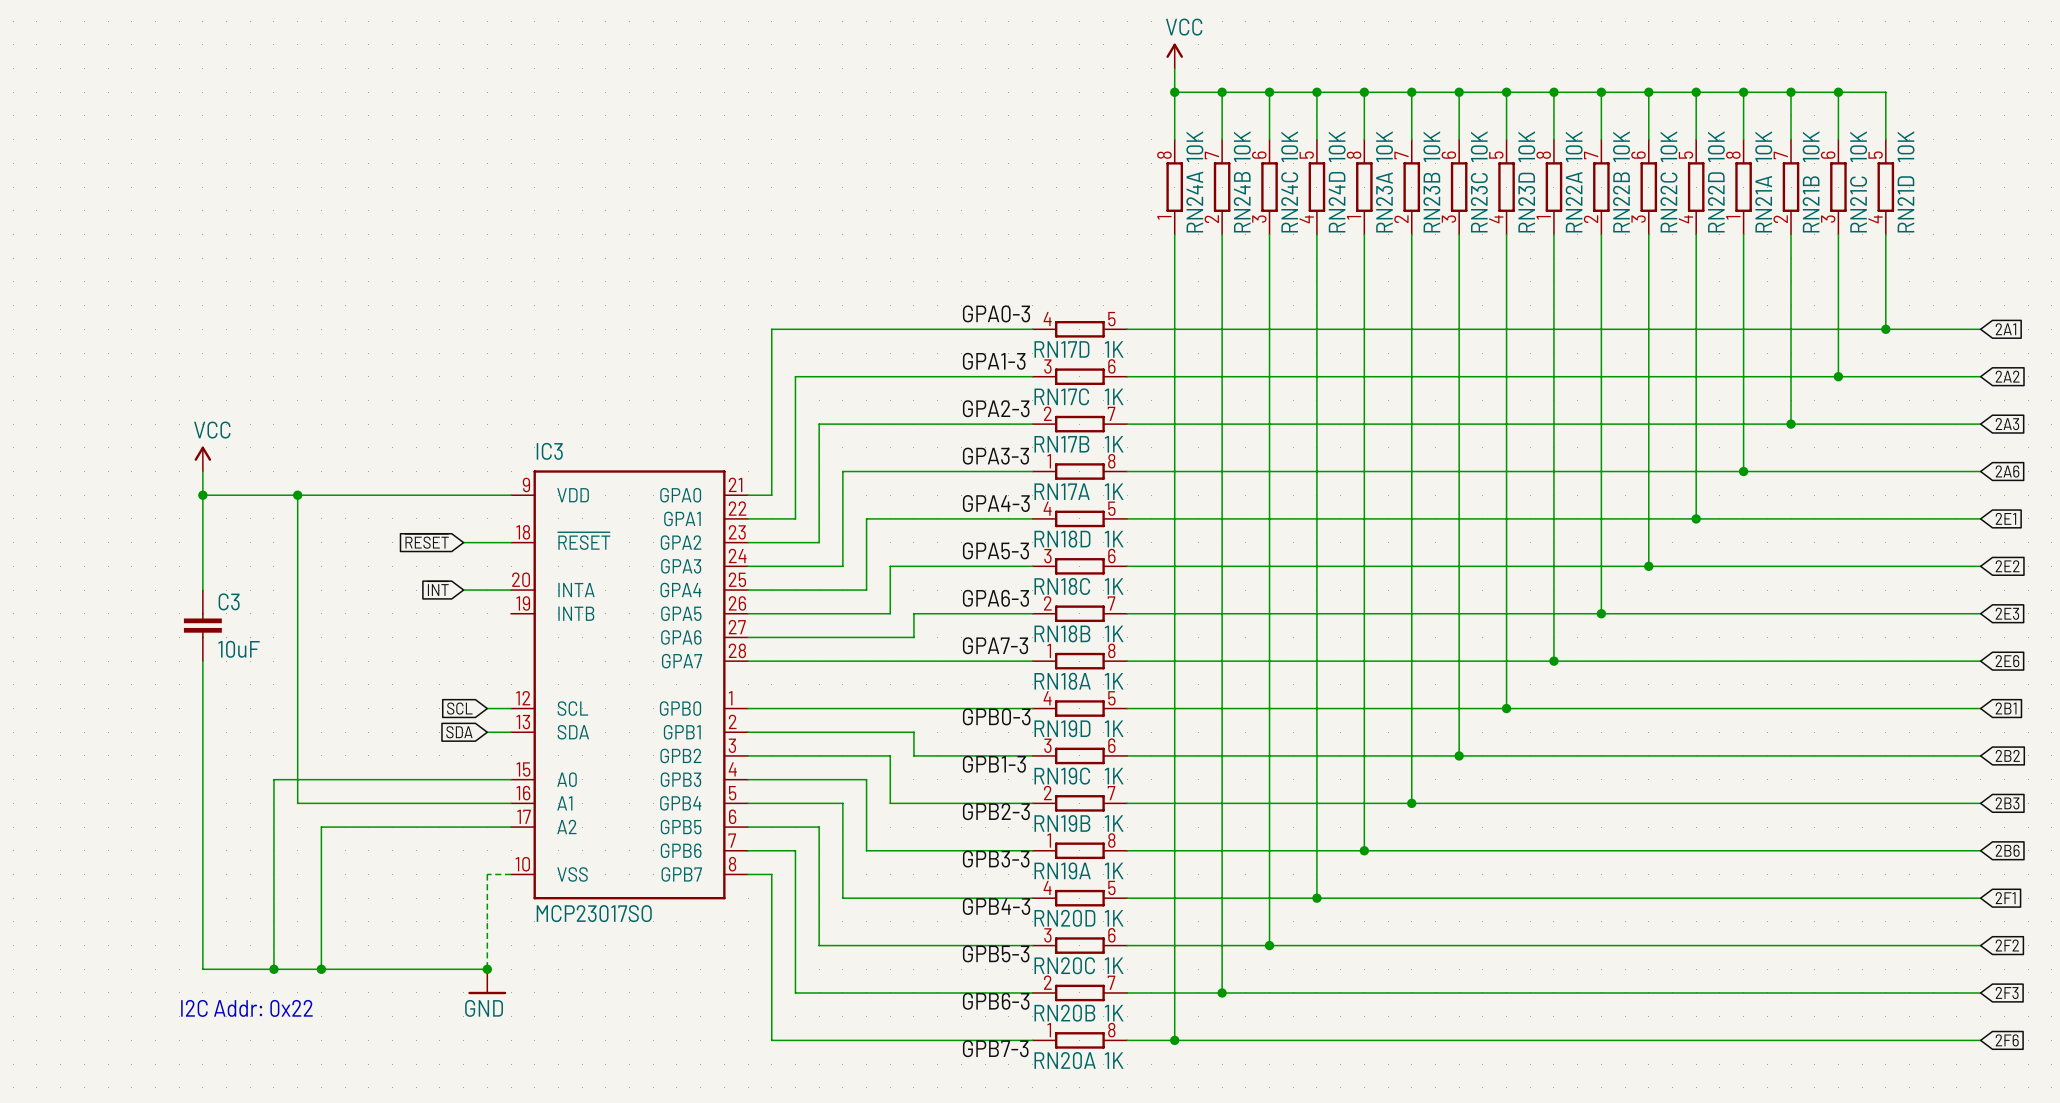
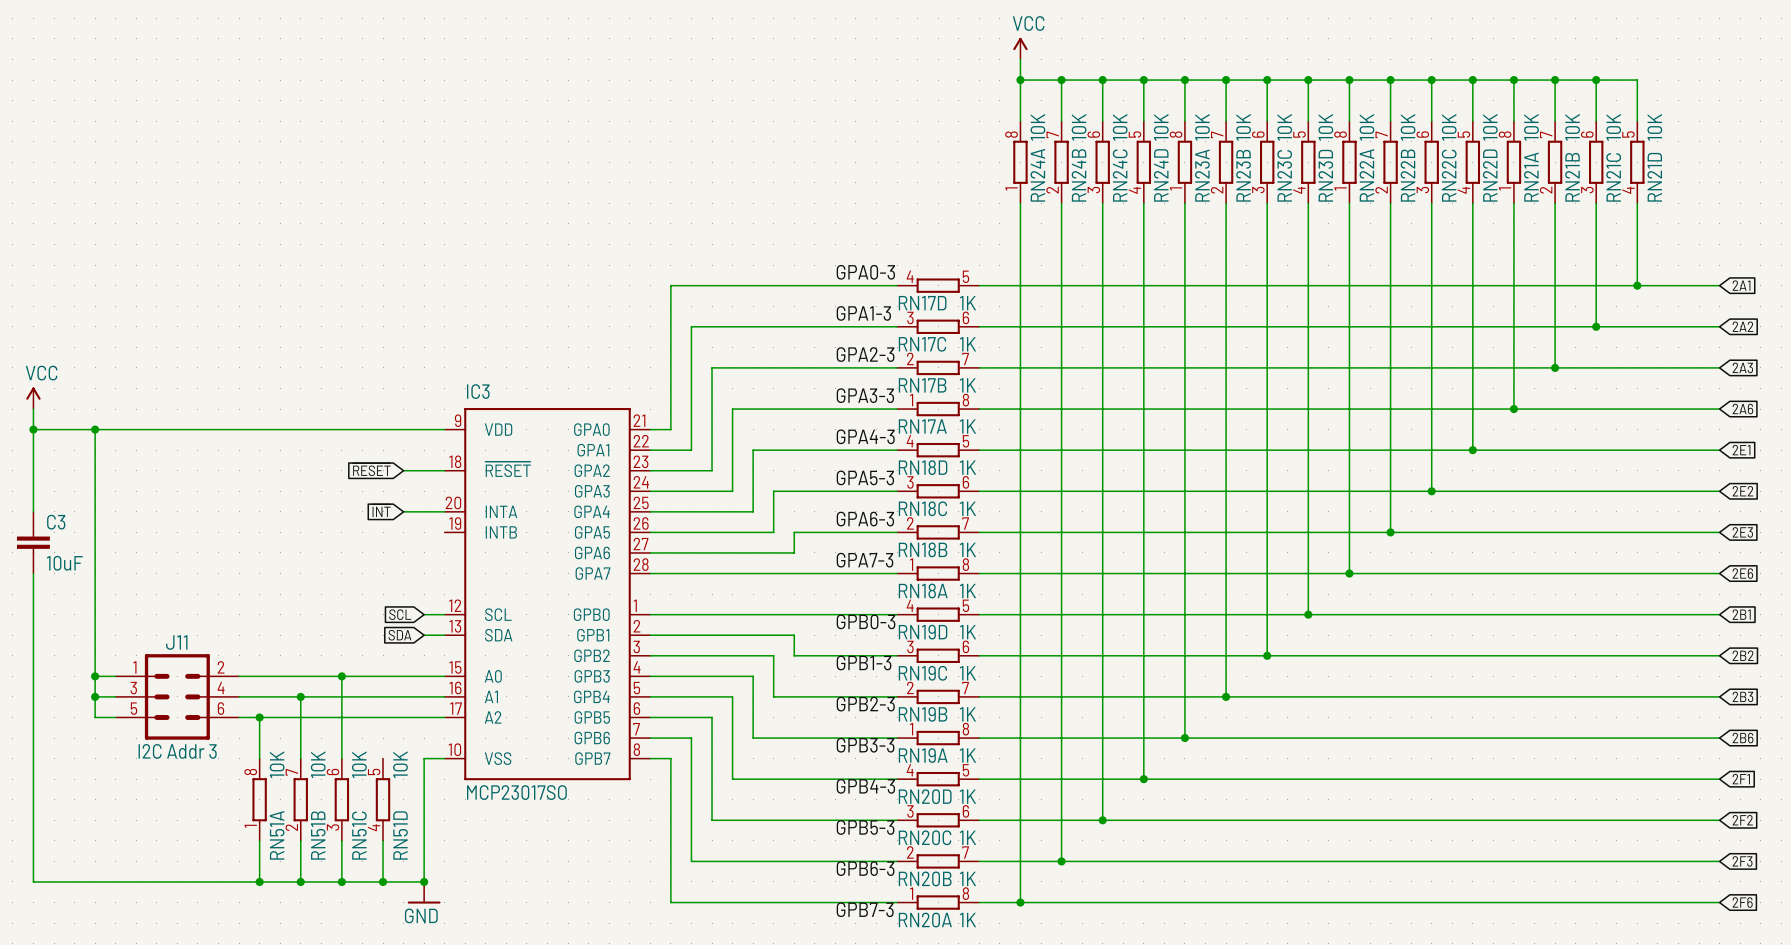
power symbol position: VCC (202, 459) -> VCC (33, 398)
wire: (202, 471) (202, 590) -> (33, 409) (33, 511)
wire: none -> (33, 429) (177, 429)
junction: none -> (33, 429)
wire: none -> (95, 429) (95, 717) (115, 717)
junction: none -> (95, 429)
junction: (202, 495) -> none
wire: (297, 495) (297, 803) -> (239, 696) (259, 696)
junction: (297, 495) -> none
C3 position: (202, 625) -> (33, 542)
wire: (202, 661) (202, 969) (487, 969) (487, 874) (511, 874) -> (33, 573) (33, 881) (424, 881) (424, 758) (444, 758)
wire: none -> (95, 676) (115, 676)
junction: none -> (95, 676)
wire: (273, 779) (273, 969) -> none
wire: none -> (341, 676) (341, 758)
junction: none -> (341, 676)
wire: none -> (95, 696) (115, 696)
junction: none -> (95, 696)
J11: none -> I2C Addr 3 (177, 696)
wire: none -> (300, 696) (300, 758)
junction: none -> (300, 696)
wire: none -> (259, 717) (259, 758)
junction: none -> (259, 717)
wire: (321, 827) (321, 969) -> (280, 717) (239, 717)
RN51A: none -> 10K (259, 799)
RN51B: none -> 10K (300, 799)
RN51C: none -> 10K (341, 799)
RN51D: none -> 10K (383, 799)
junction: (273, 969) -> none
wire: none -> (259, 840) (259, 881)
junction: (321, 969) -> none
wire: none -> (300, 840) (300, 881)
wire: none -> (341, 840) (341, 881)
wire: none -> (383, 840) (383, 881)
junction: (487, 969) -> none
power symbol position: GND (487, 981) -> GND (424, 892)
text: I2C Addr: 0x22 (246, 1008) -> none
junction: none -> (259, 881)
junction: none -> (300, 881)
junction: none -> (341, 881)
junction: none -> (383, 881)
junction: none -> (424, 881)

